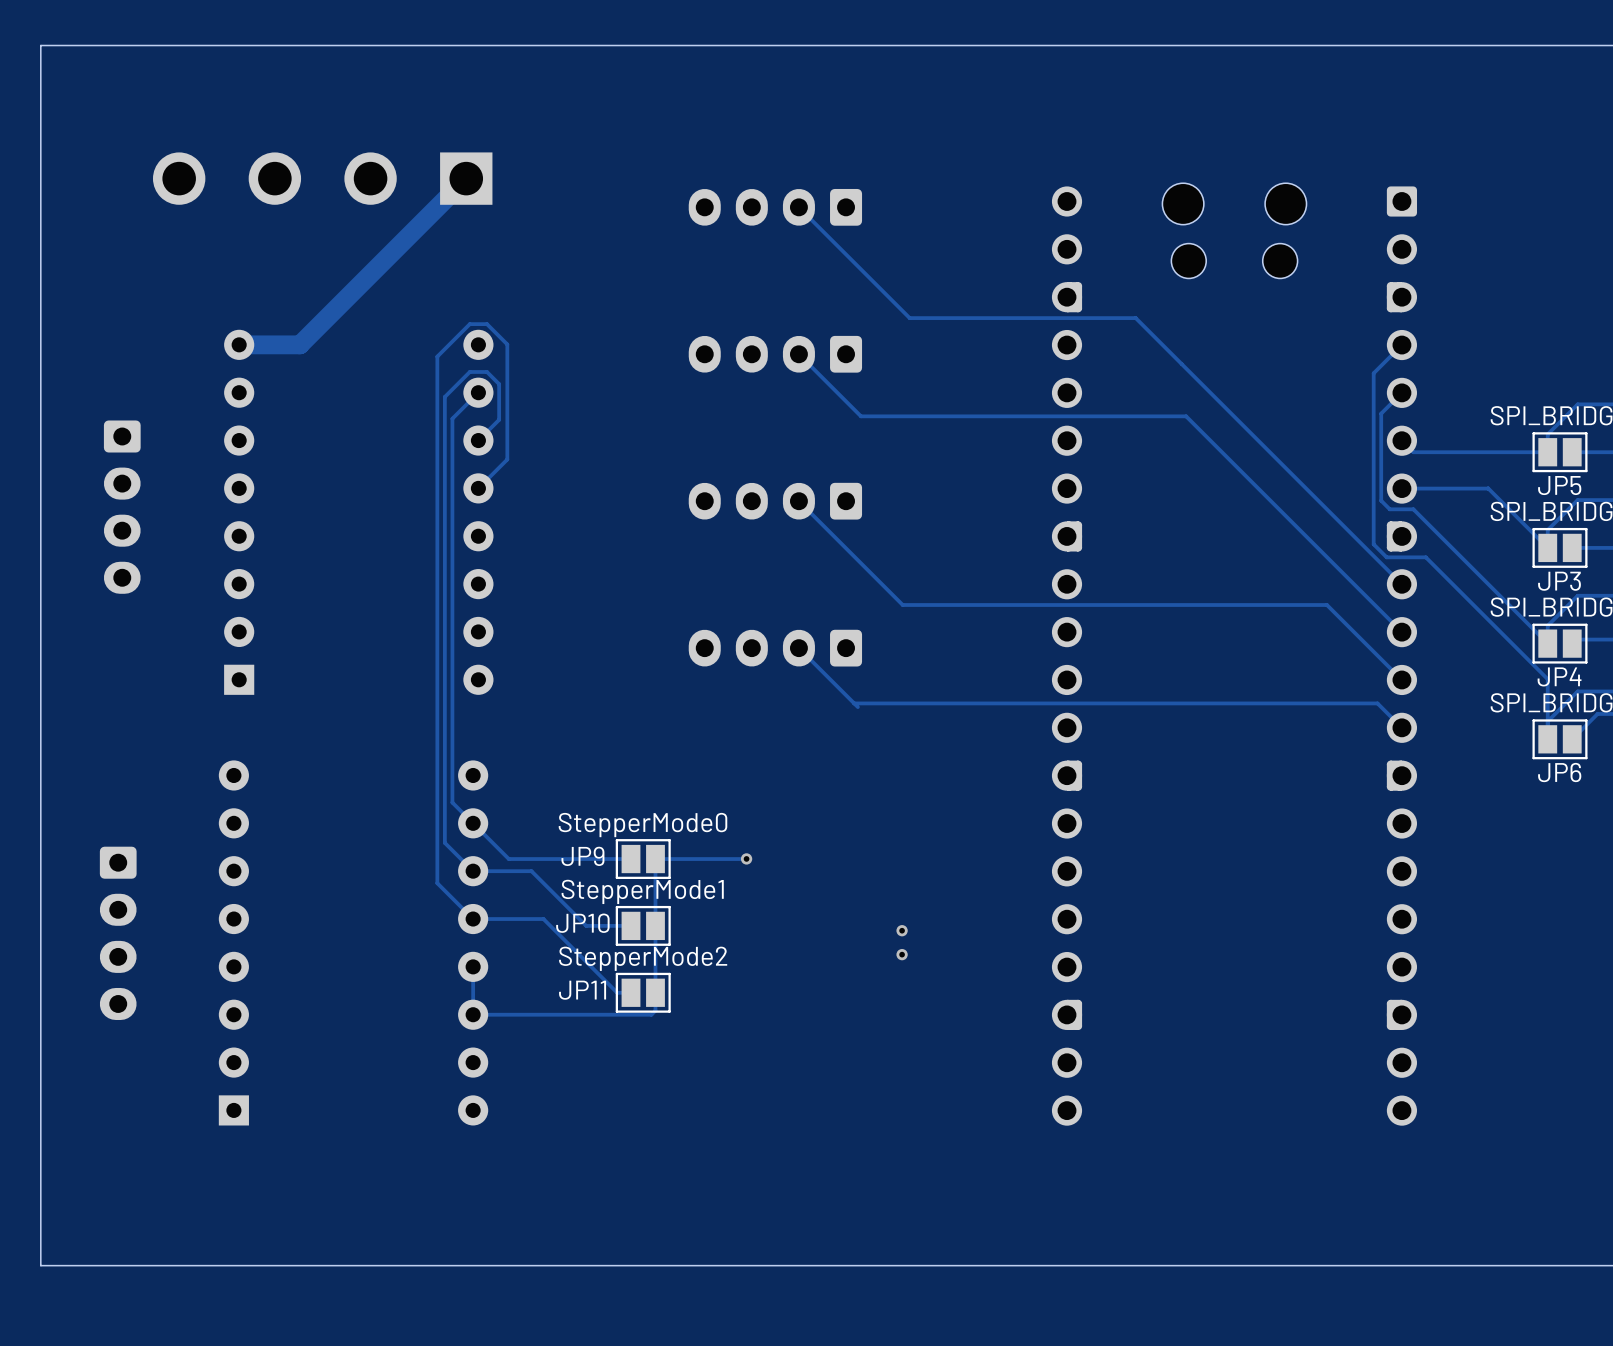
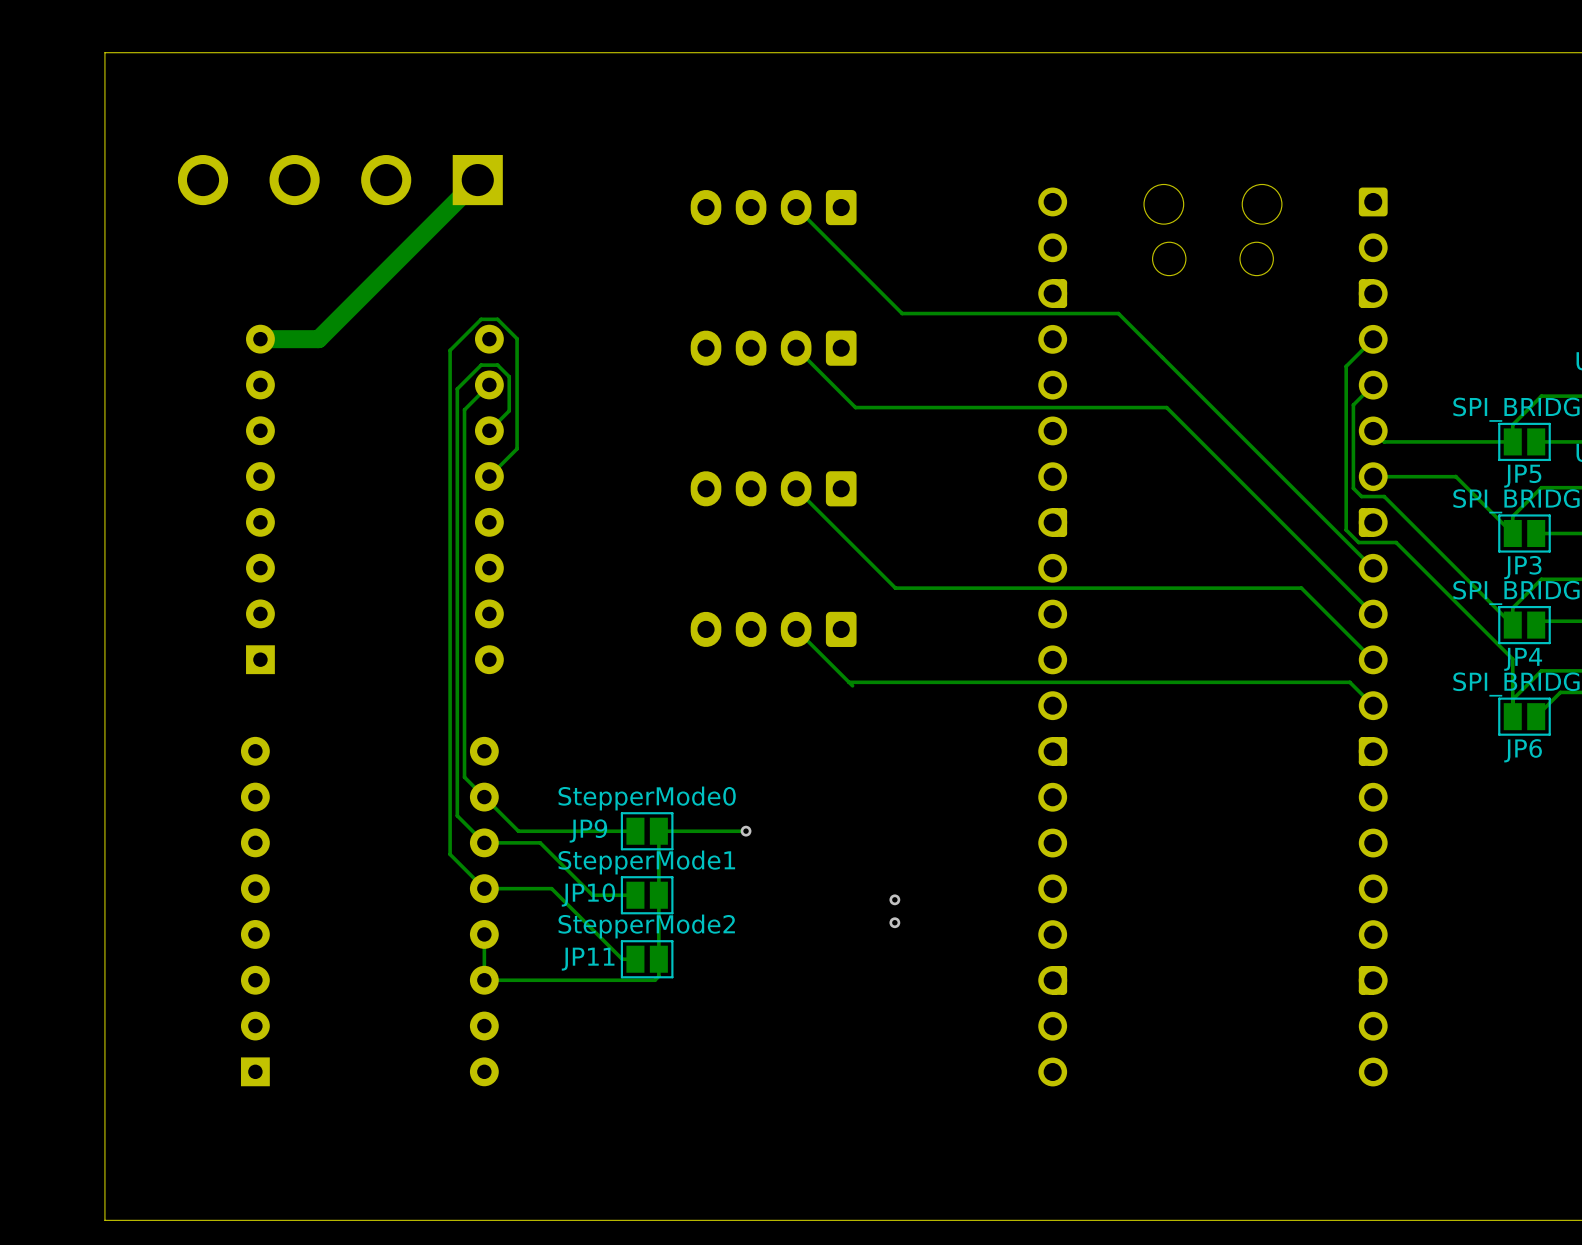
board edge: (76, 45) (40, 45) (40, 1265) (76, 1265) -> (104, 52) (104, 1220)
part: (122, 507) -> none
part: (118, 933) -> none

